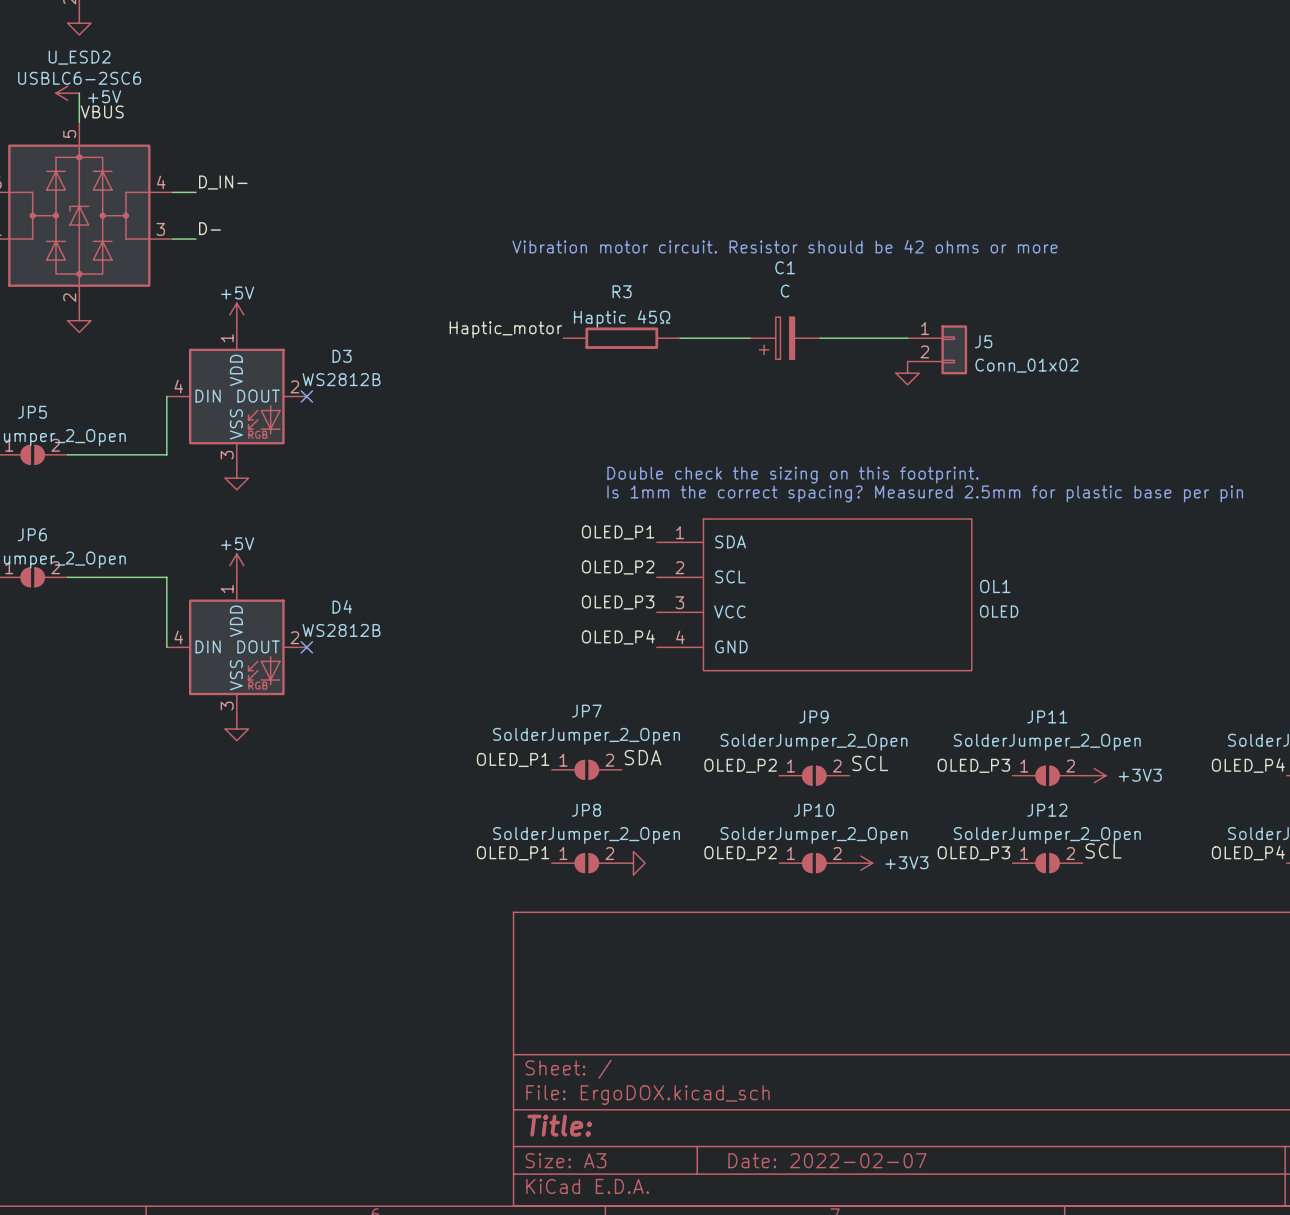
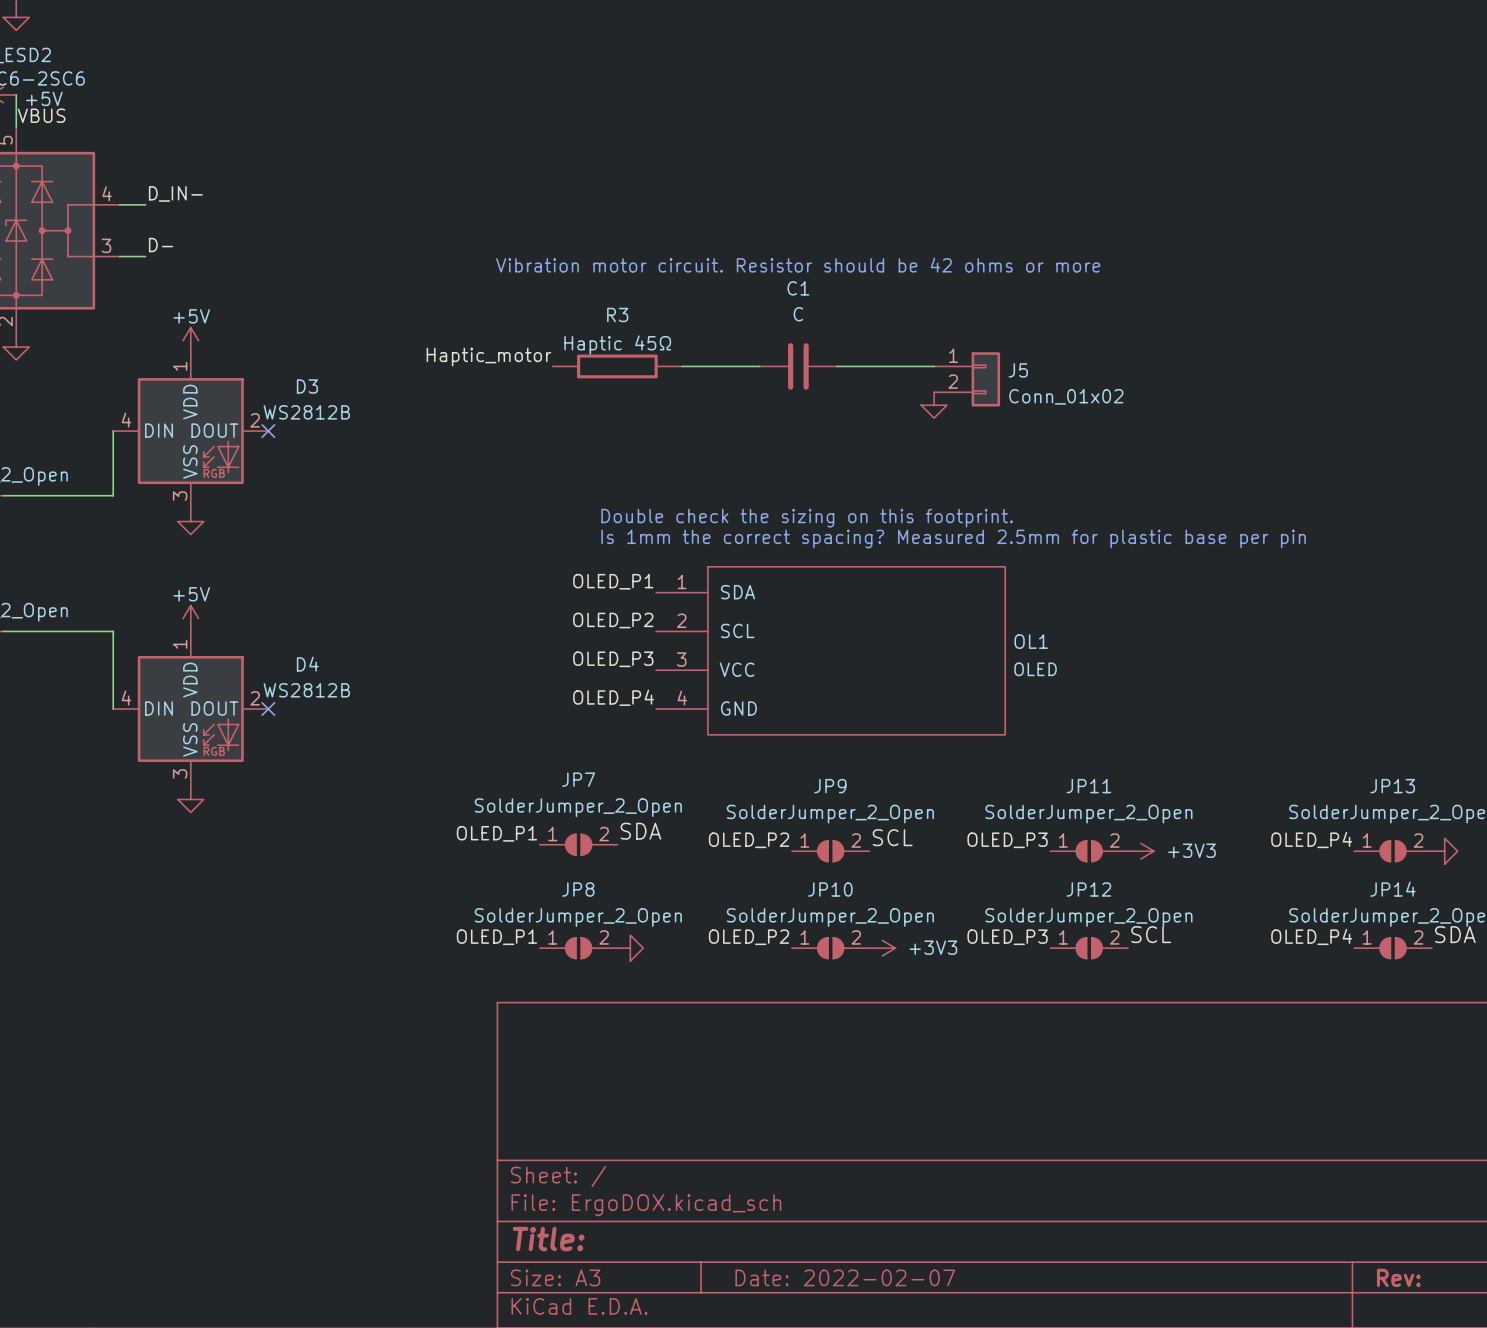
C1 symbol: [750, 317, 821, 360] -> [759, 343, 838, 390]

